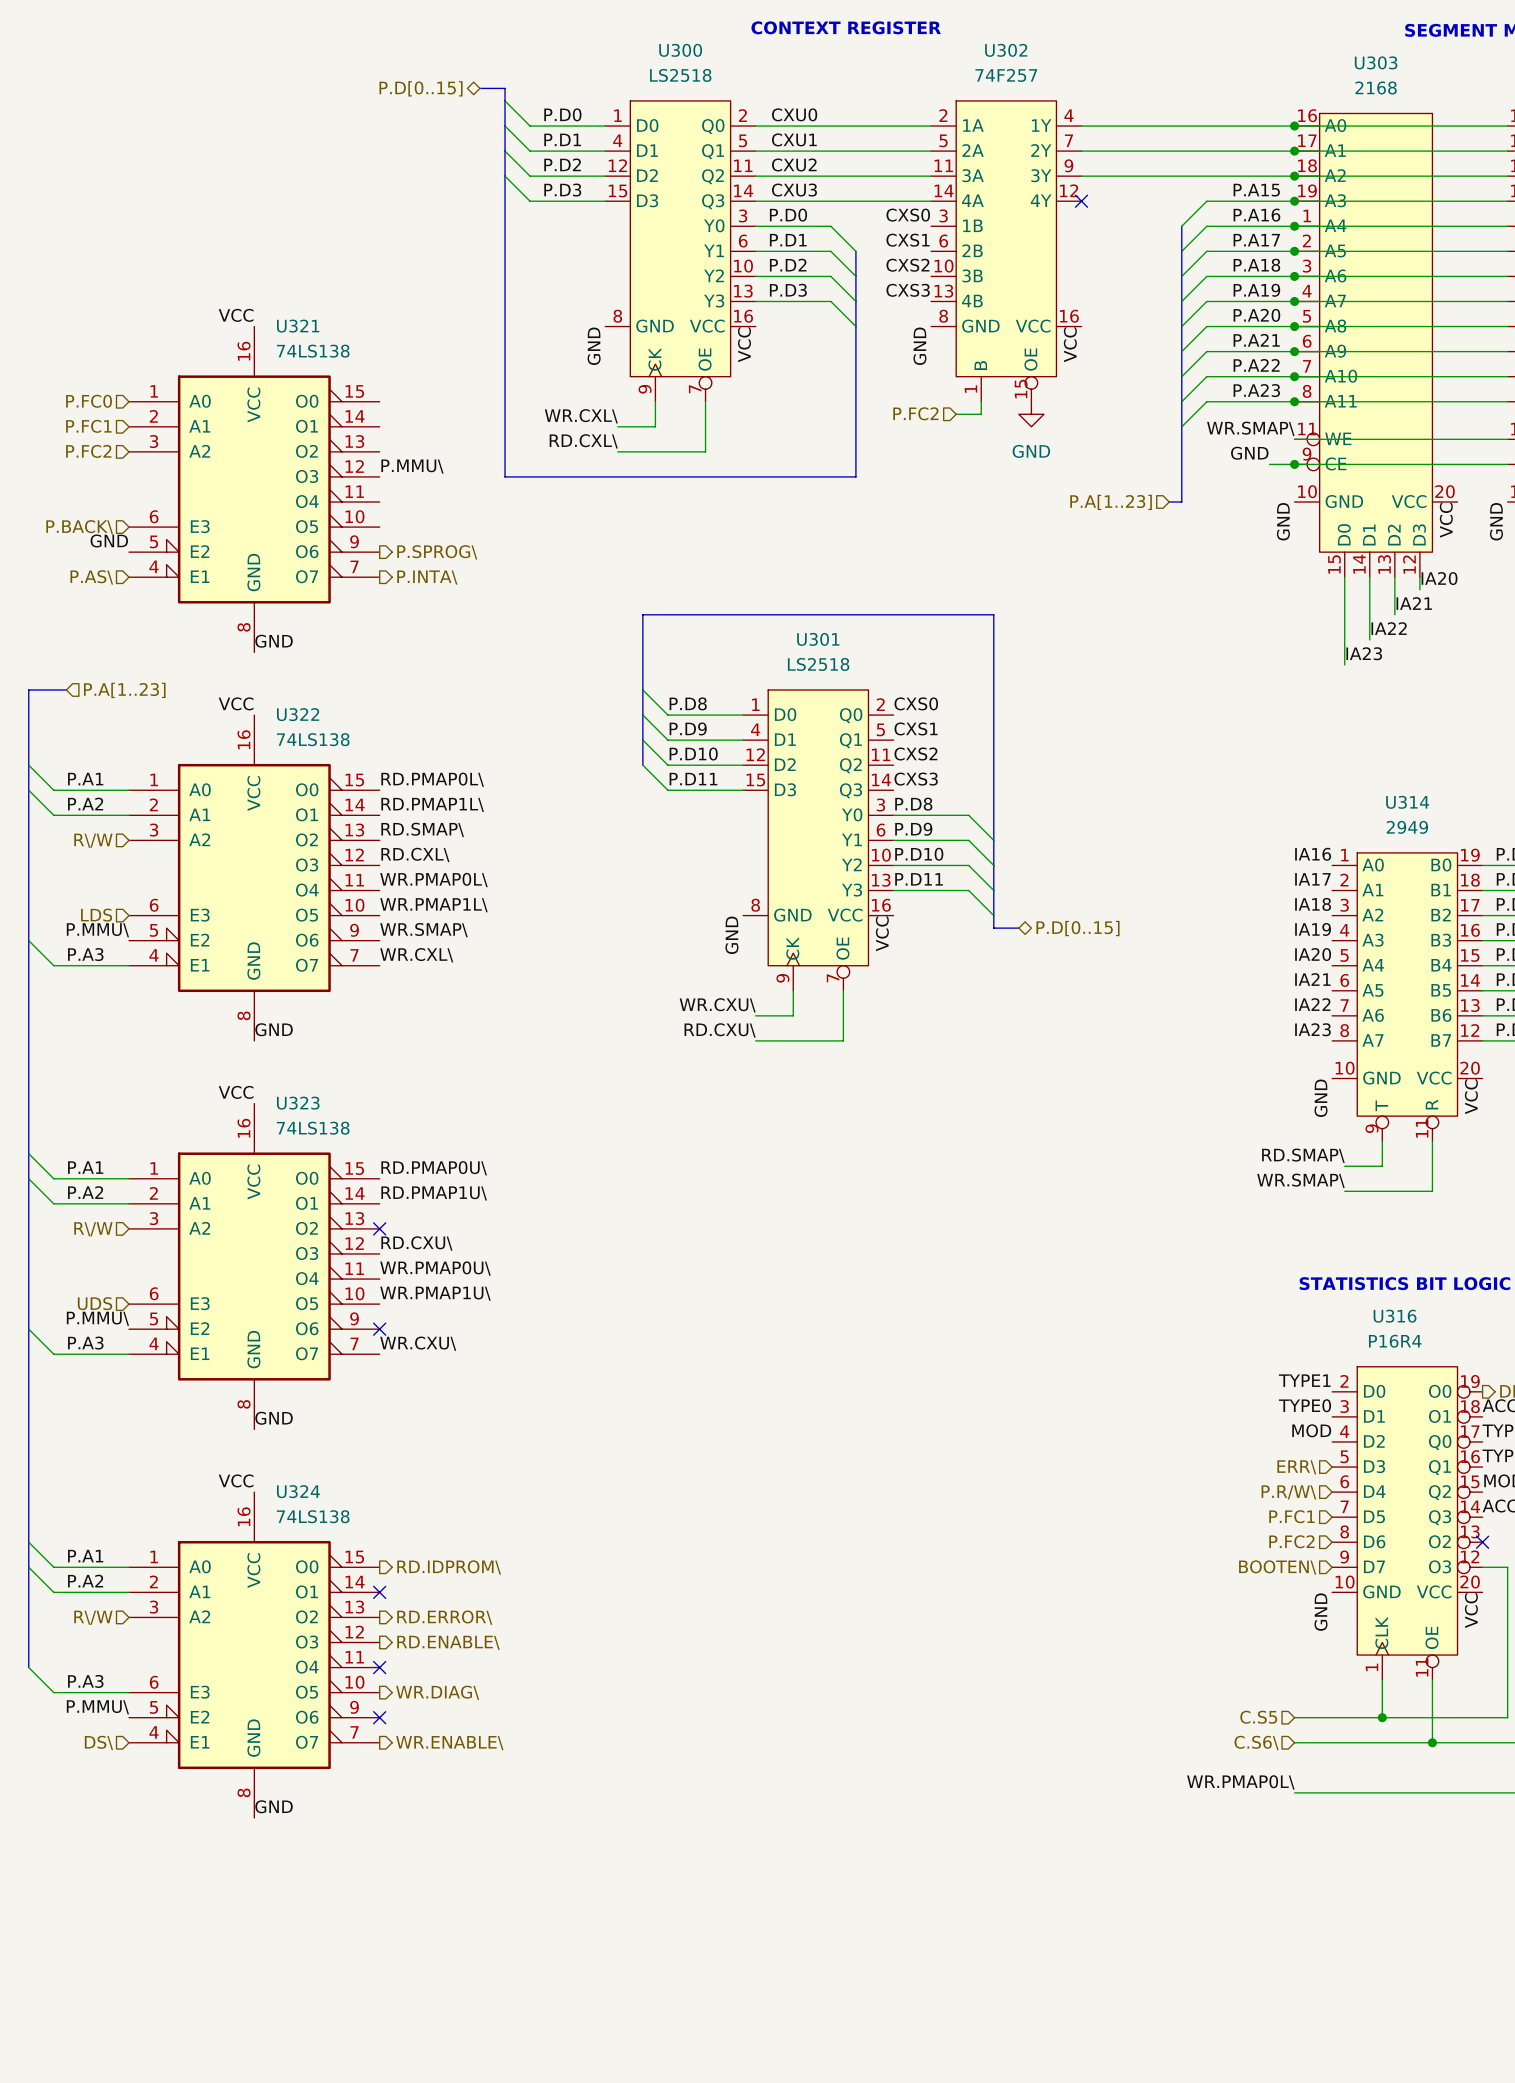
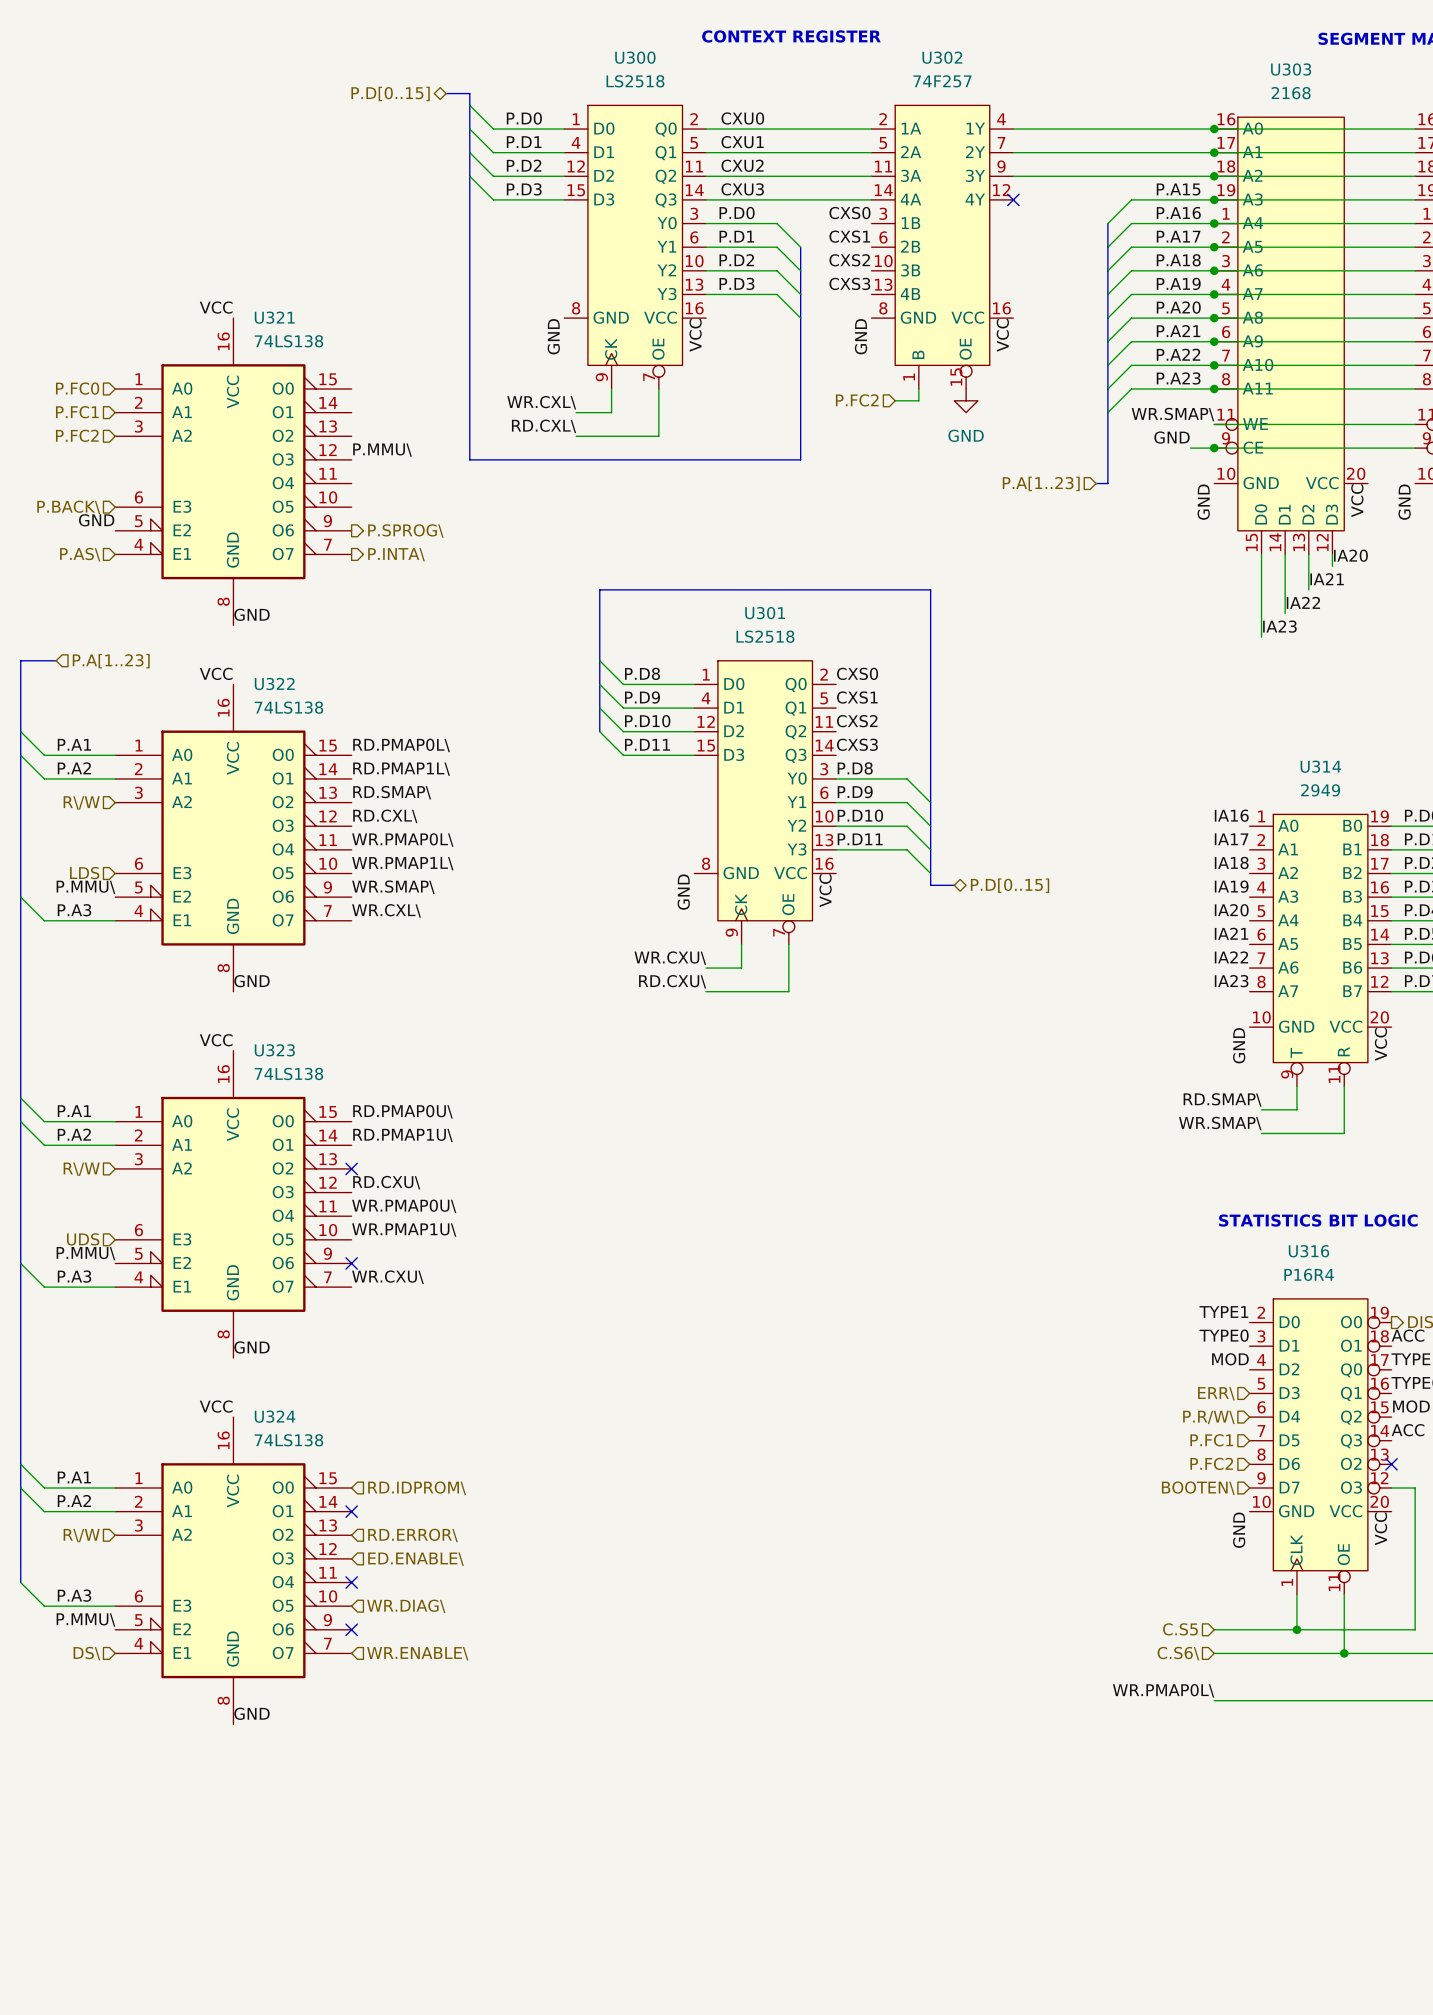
hierarchical label shape: output (449, 1567) -> input (417, 1488)
hierarchical label shape: output (444, 1617) -> input (412, 1535)
hierarchical label shape: output (448, 1642) -> input (416, 1559)
hierarchical label: RD.ENABLE\ (448, 1642) -> ED.ENABLE\ (416, 1559)
hierarchical label shape: output (437, 1692) -> input (406, 1606)
hierarchical label shape: output (449, 1743) -> input (417, 1653)

